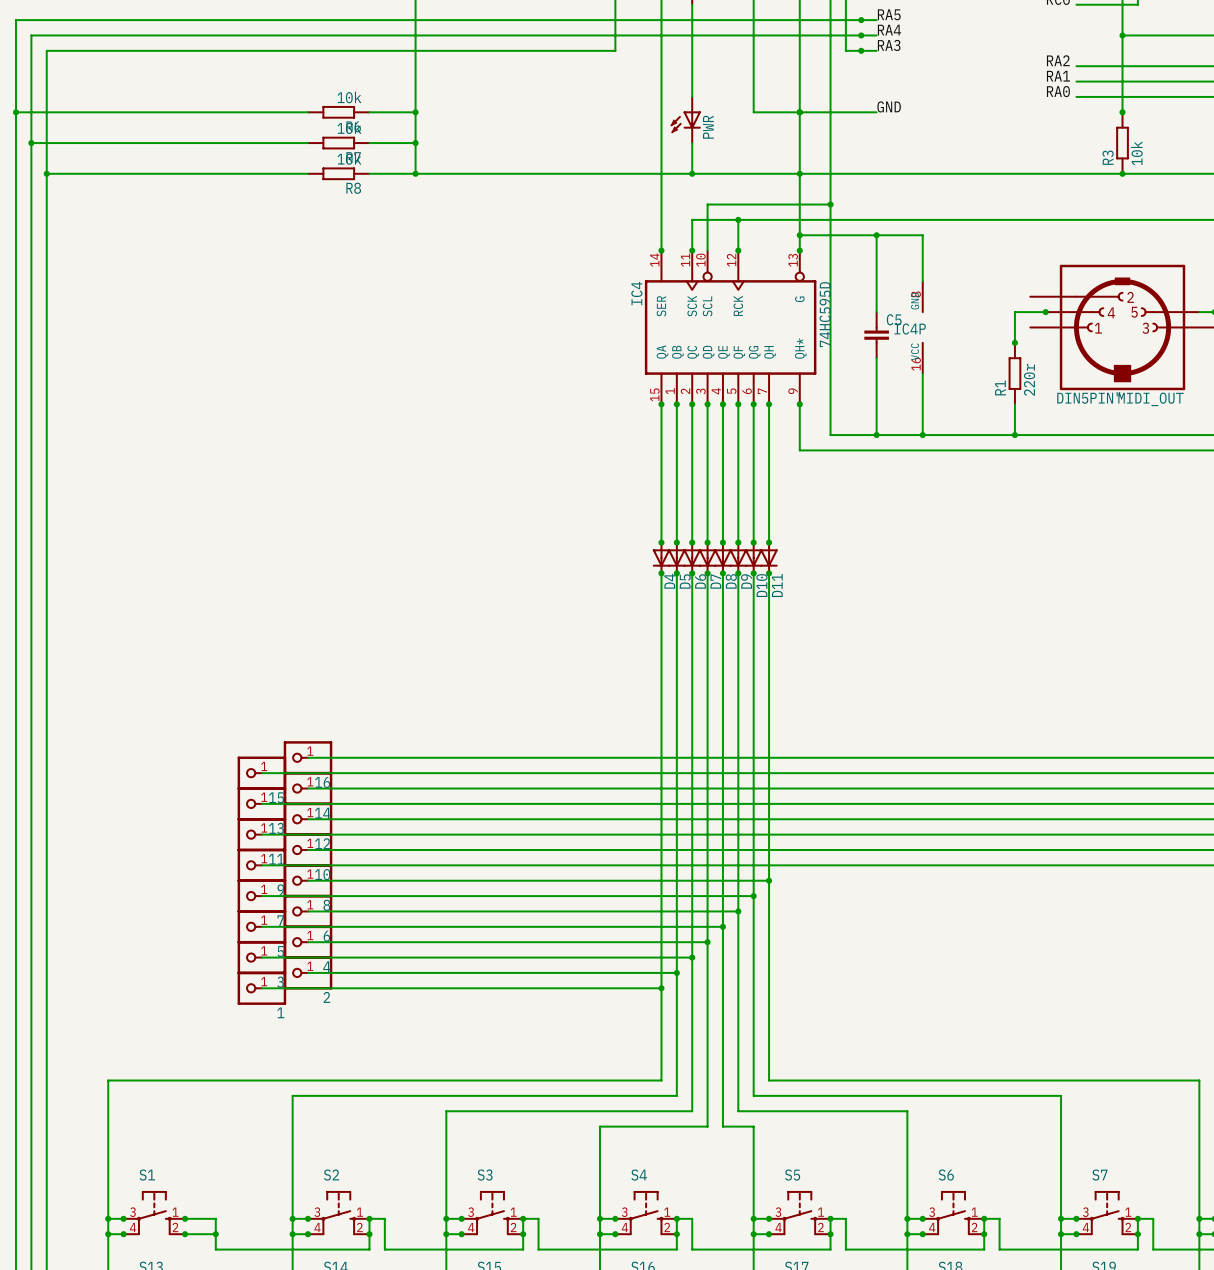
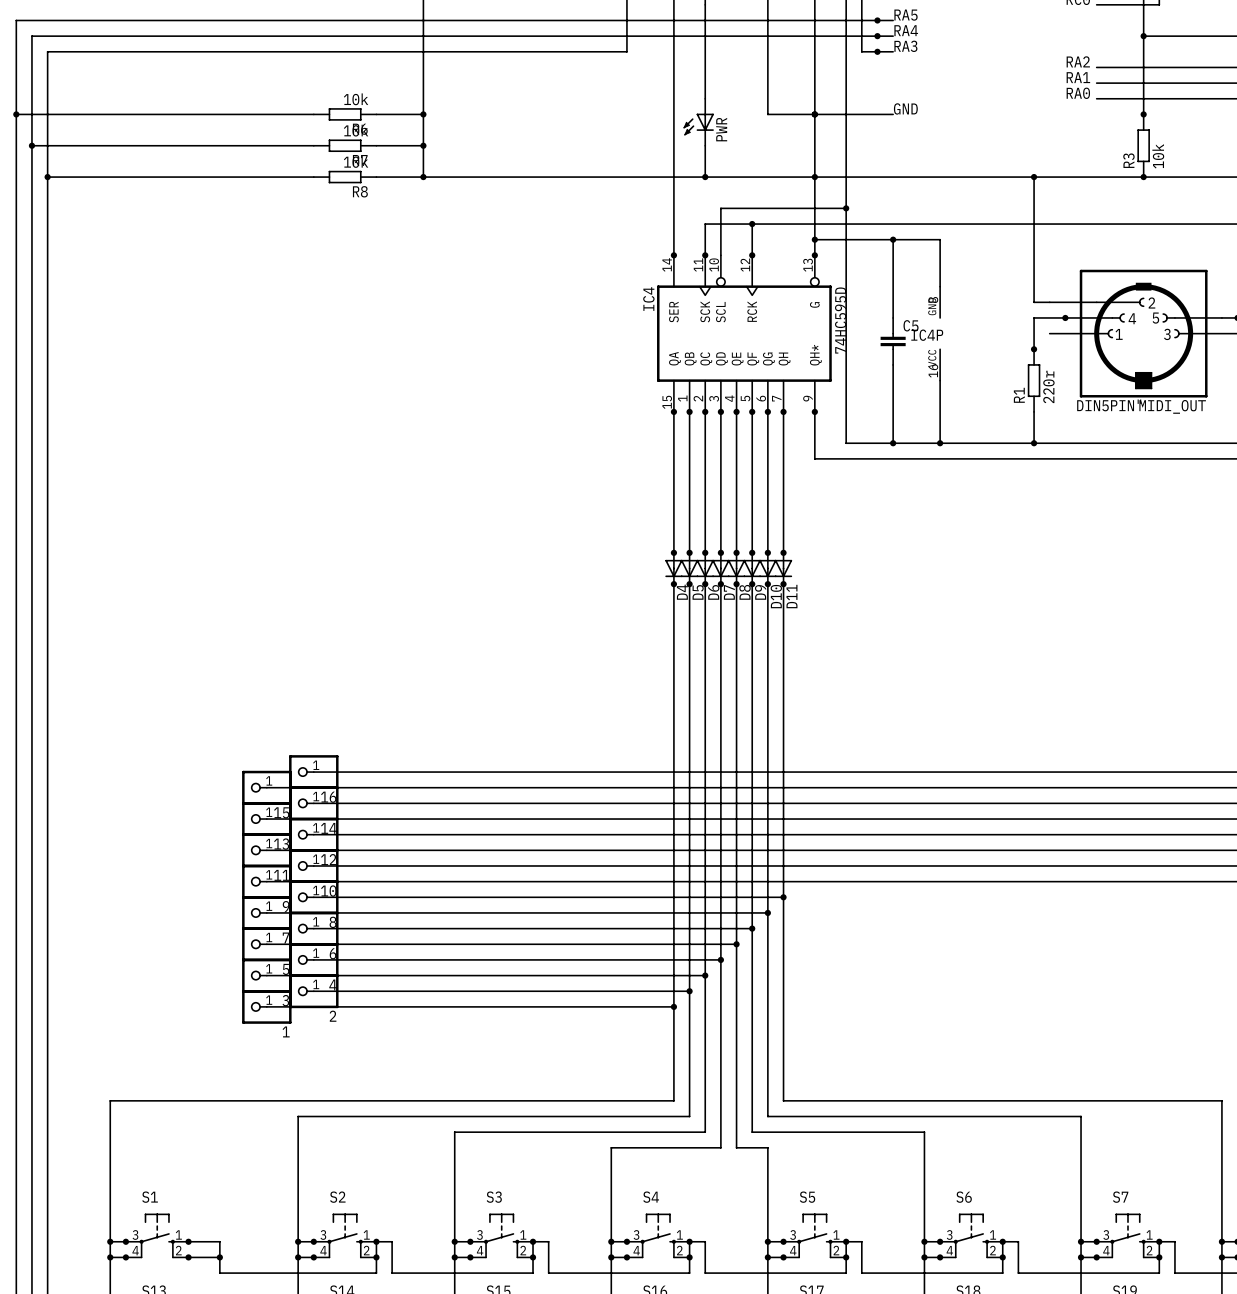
wire: none -> (1034, 177) (1034, 302) (1049, 302)
junction: none -> (1034, 177)

